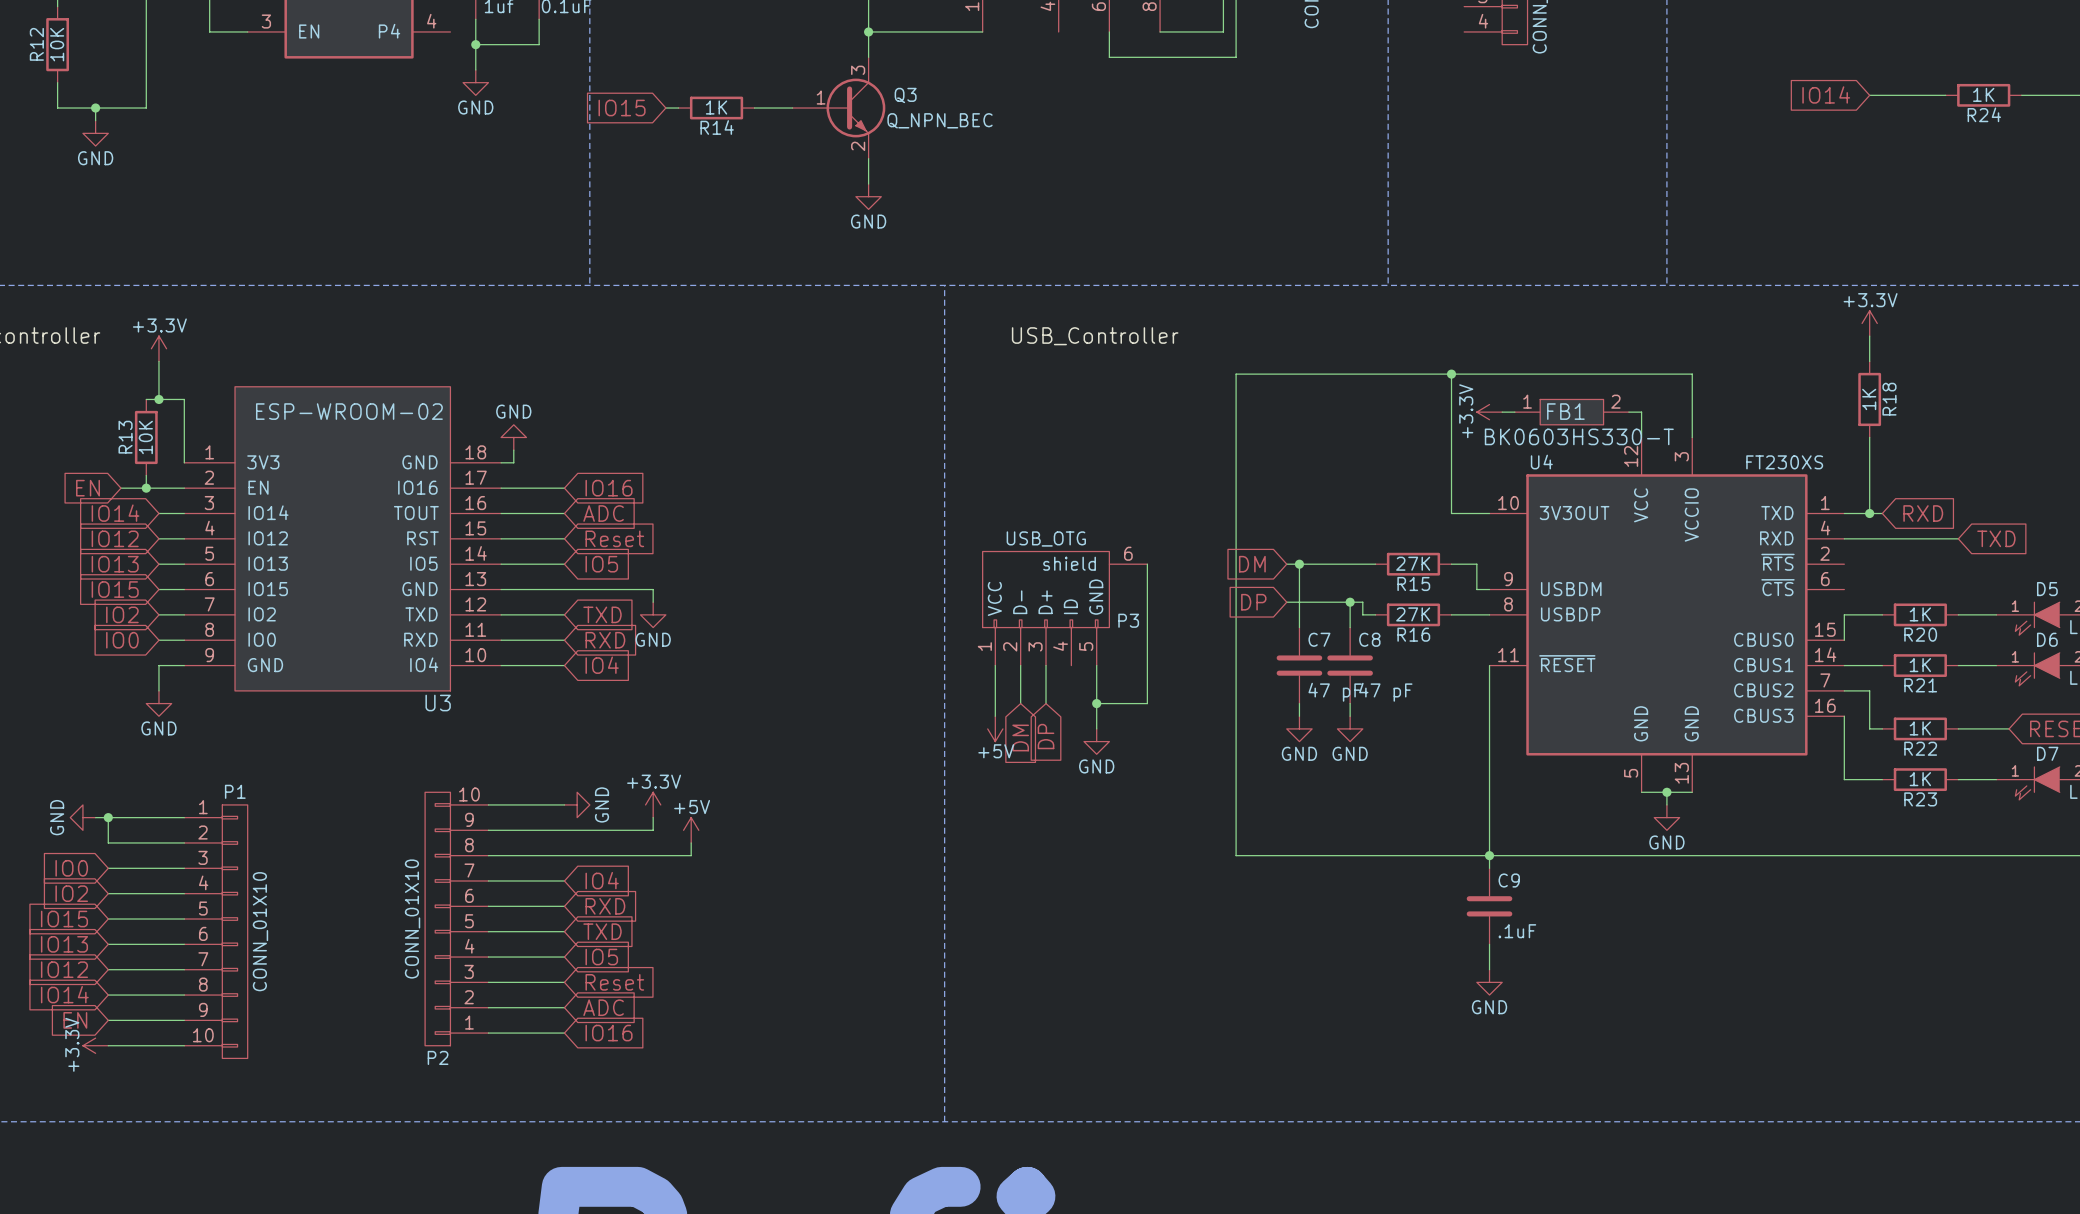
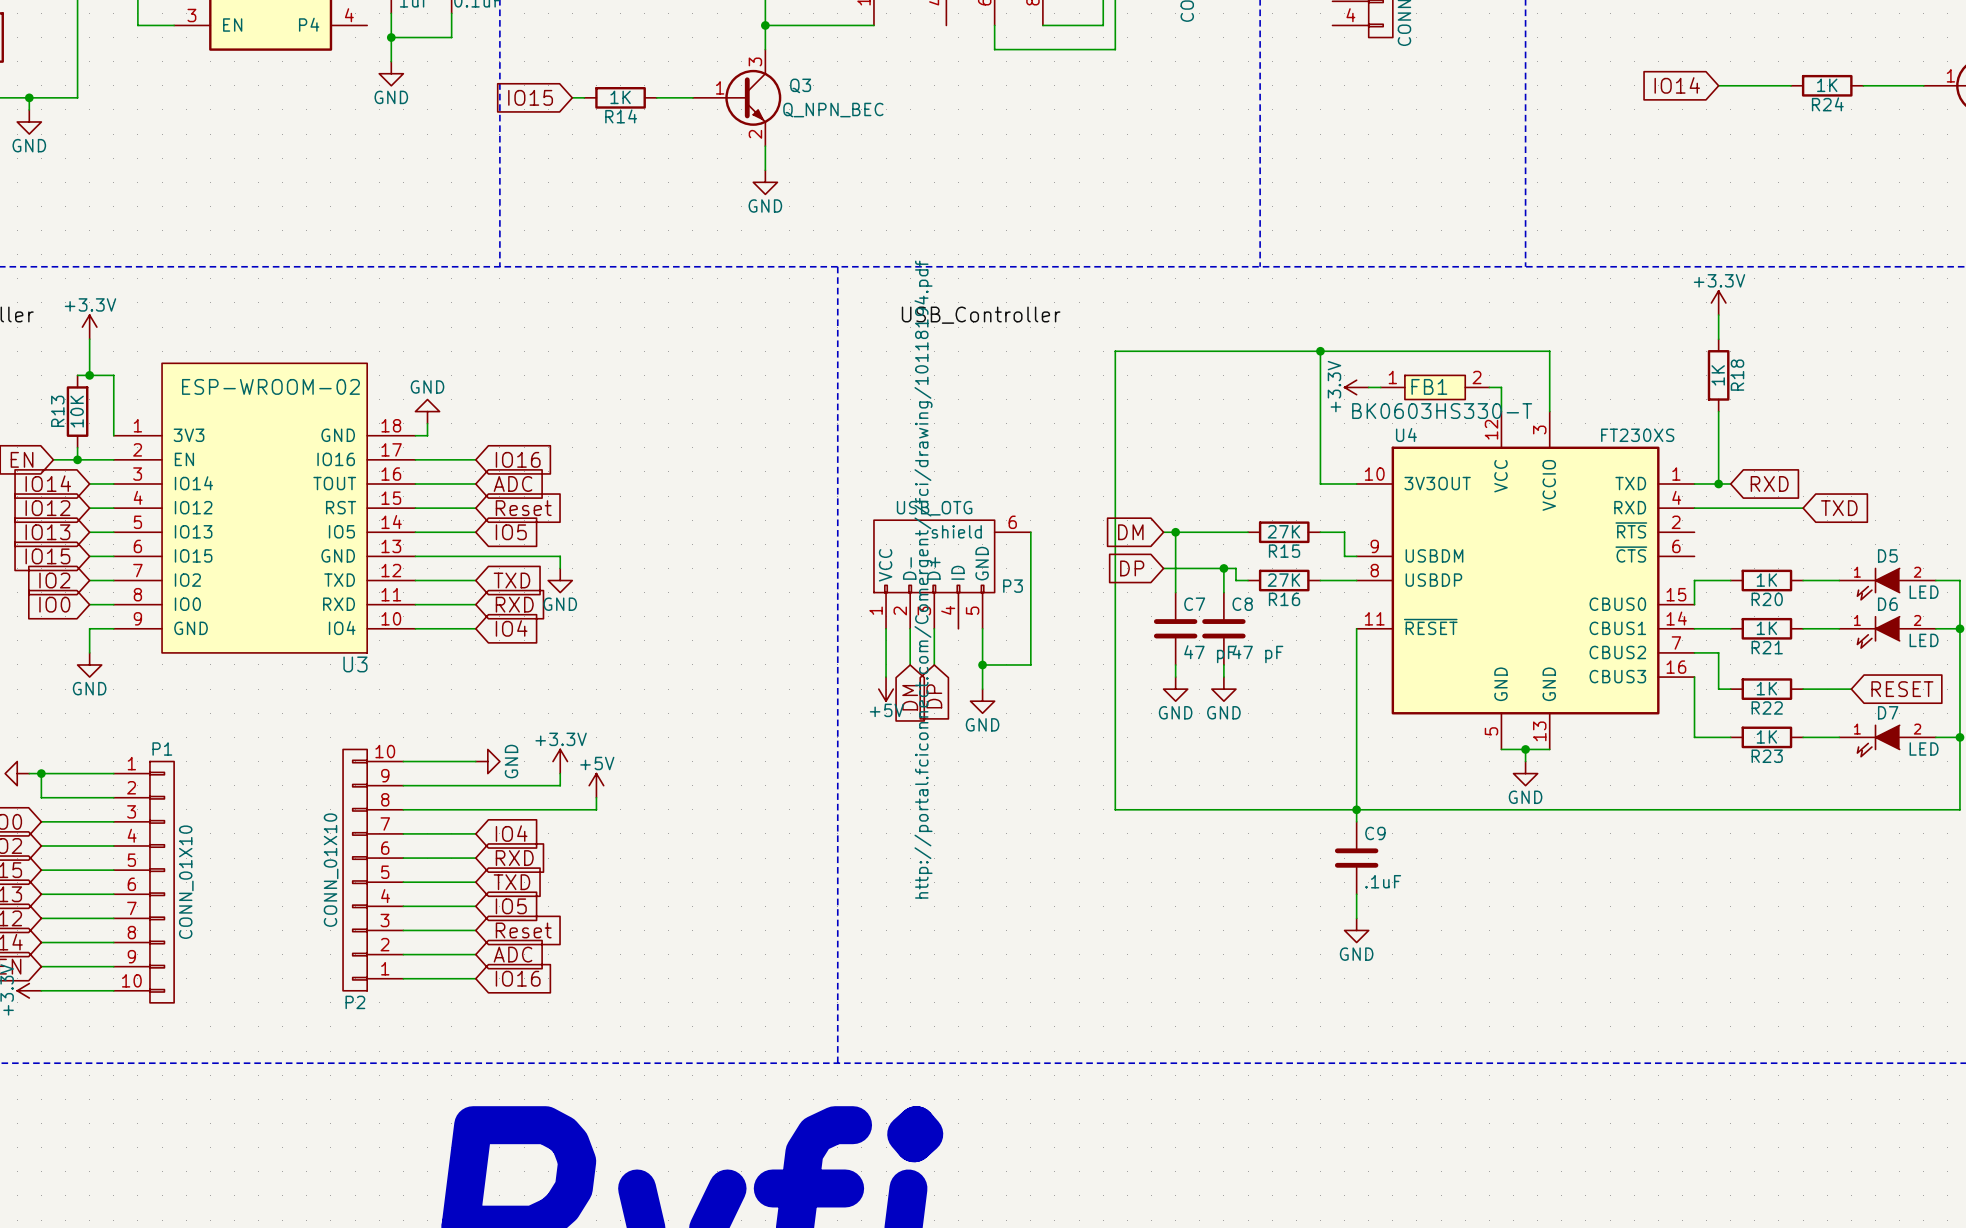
P3 text: none -> http://portal.fciconnect.com/Comergent//fci/drawing/10118194.pdf (923, 579)

